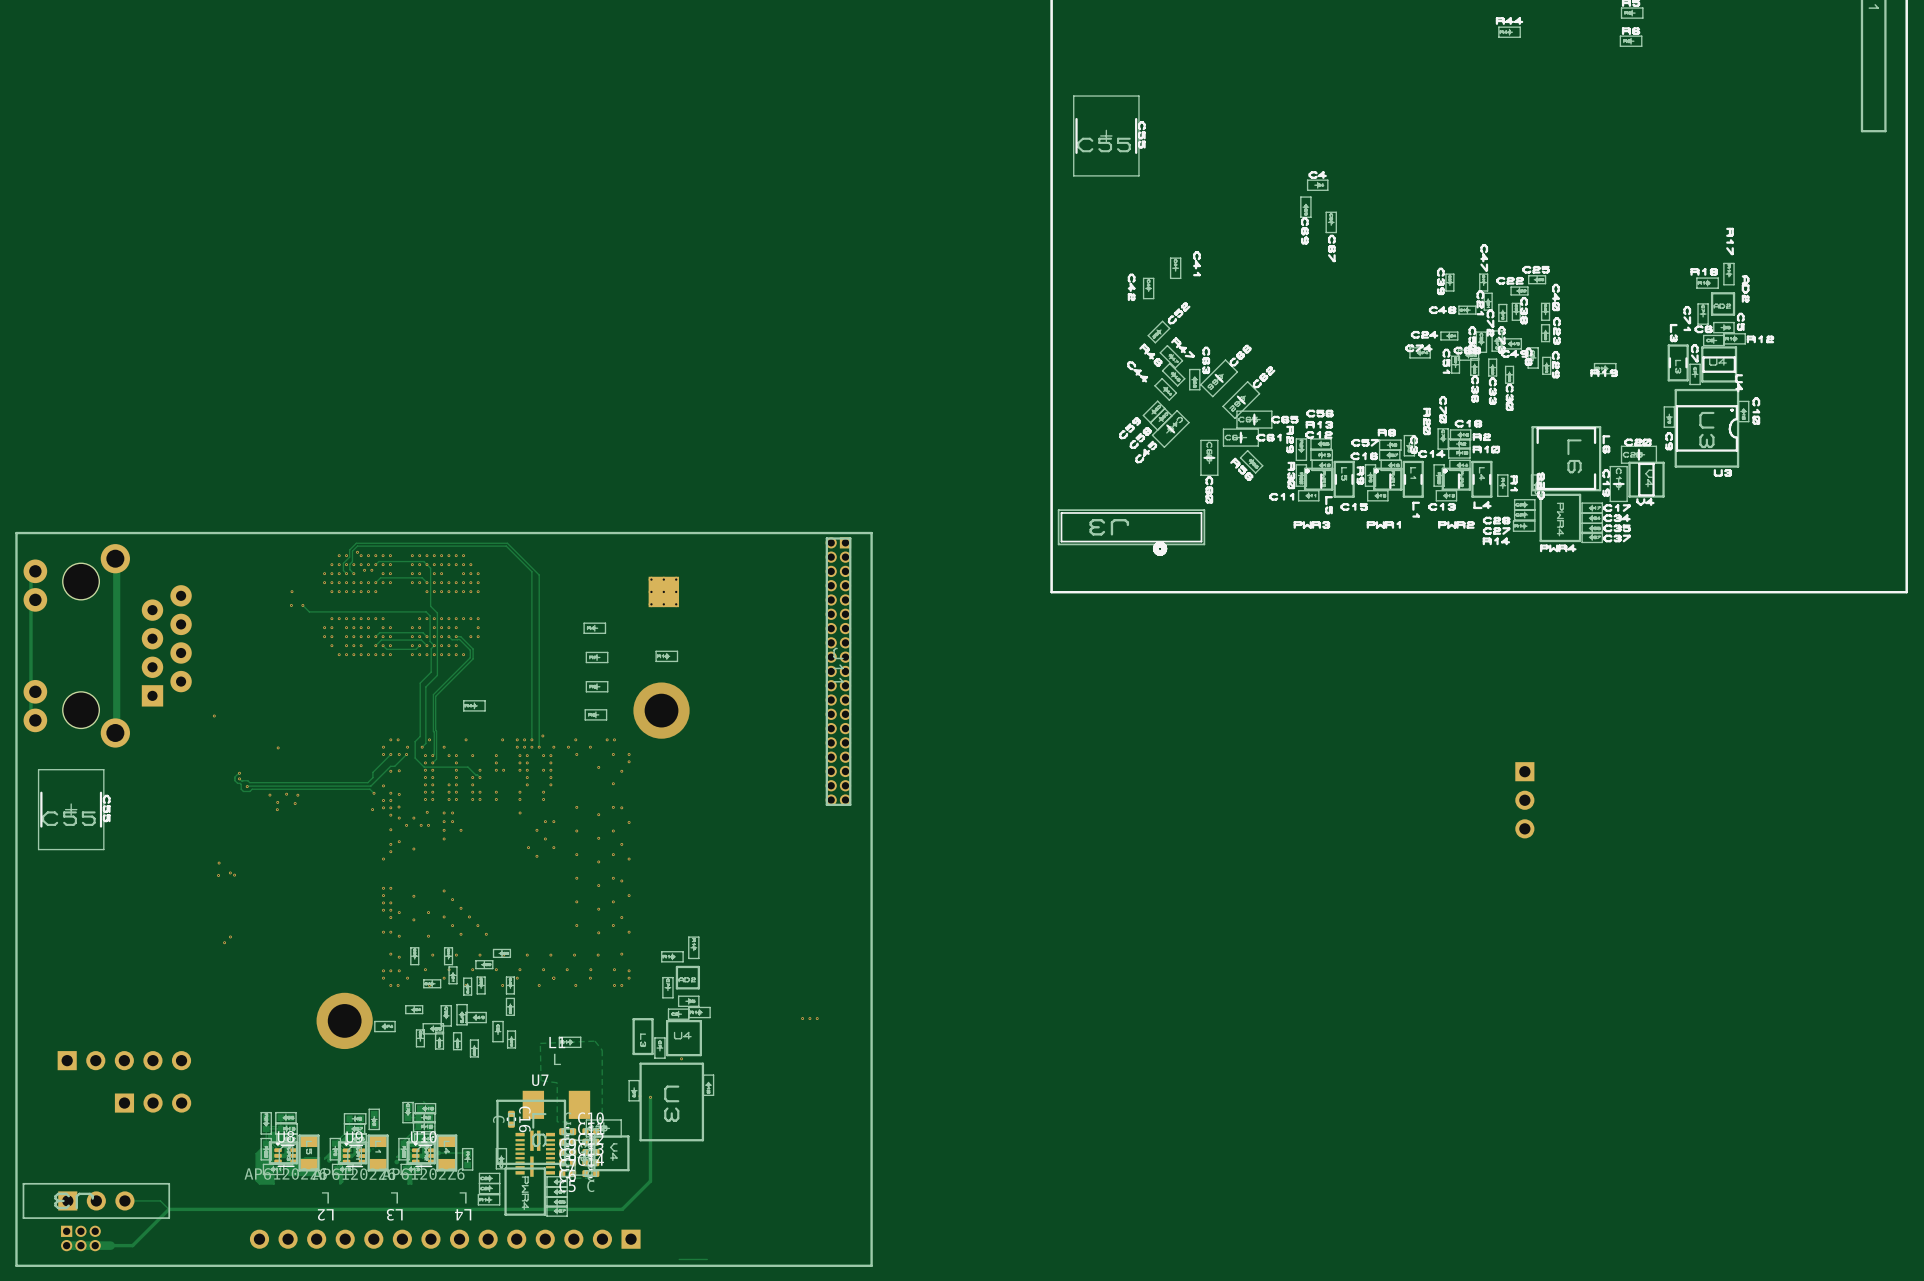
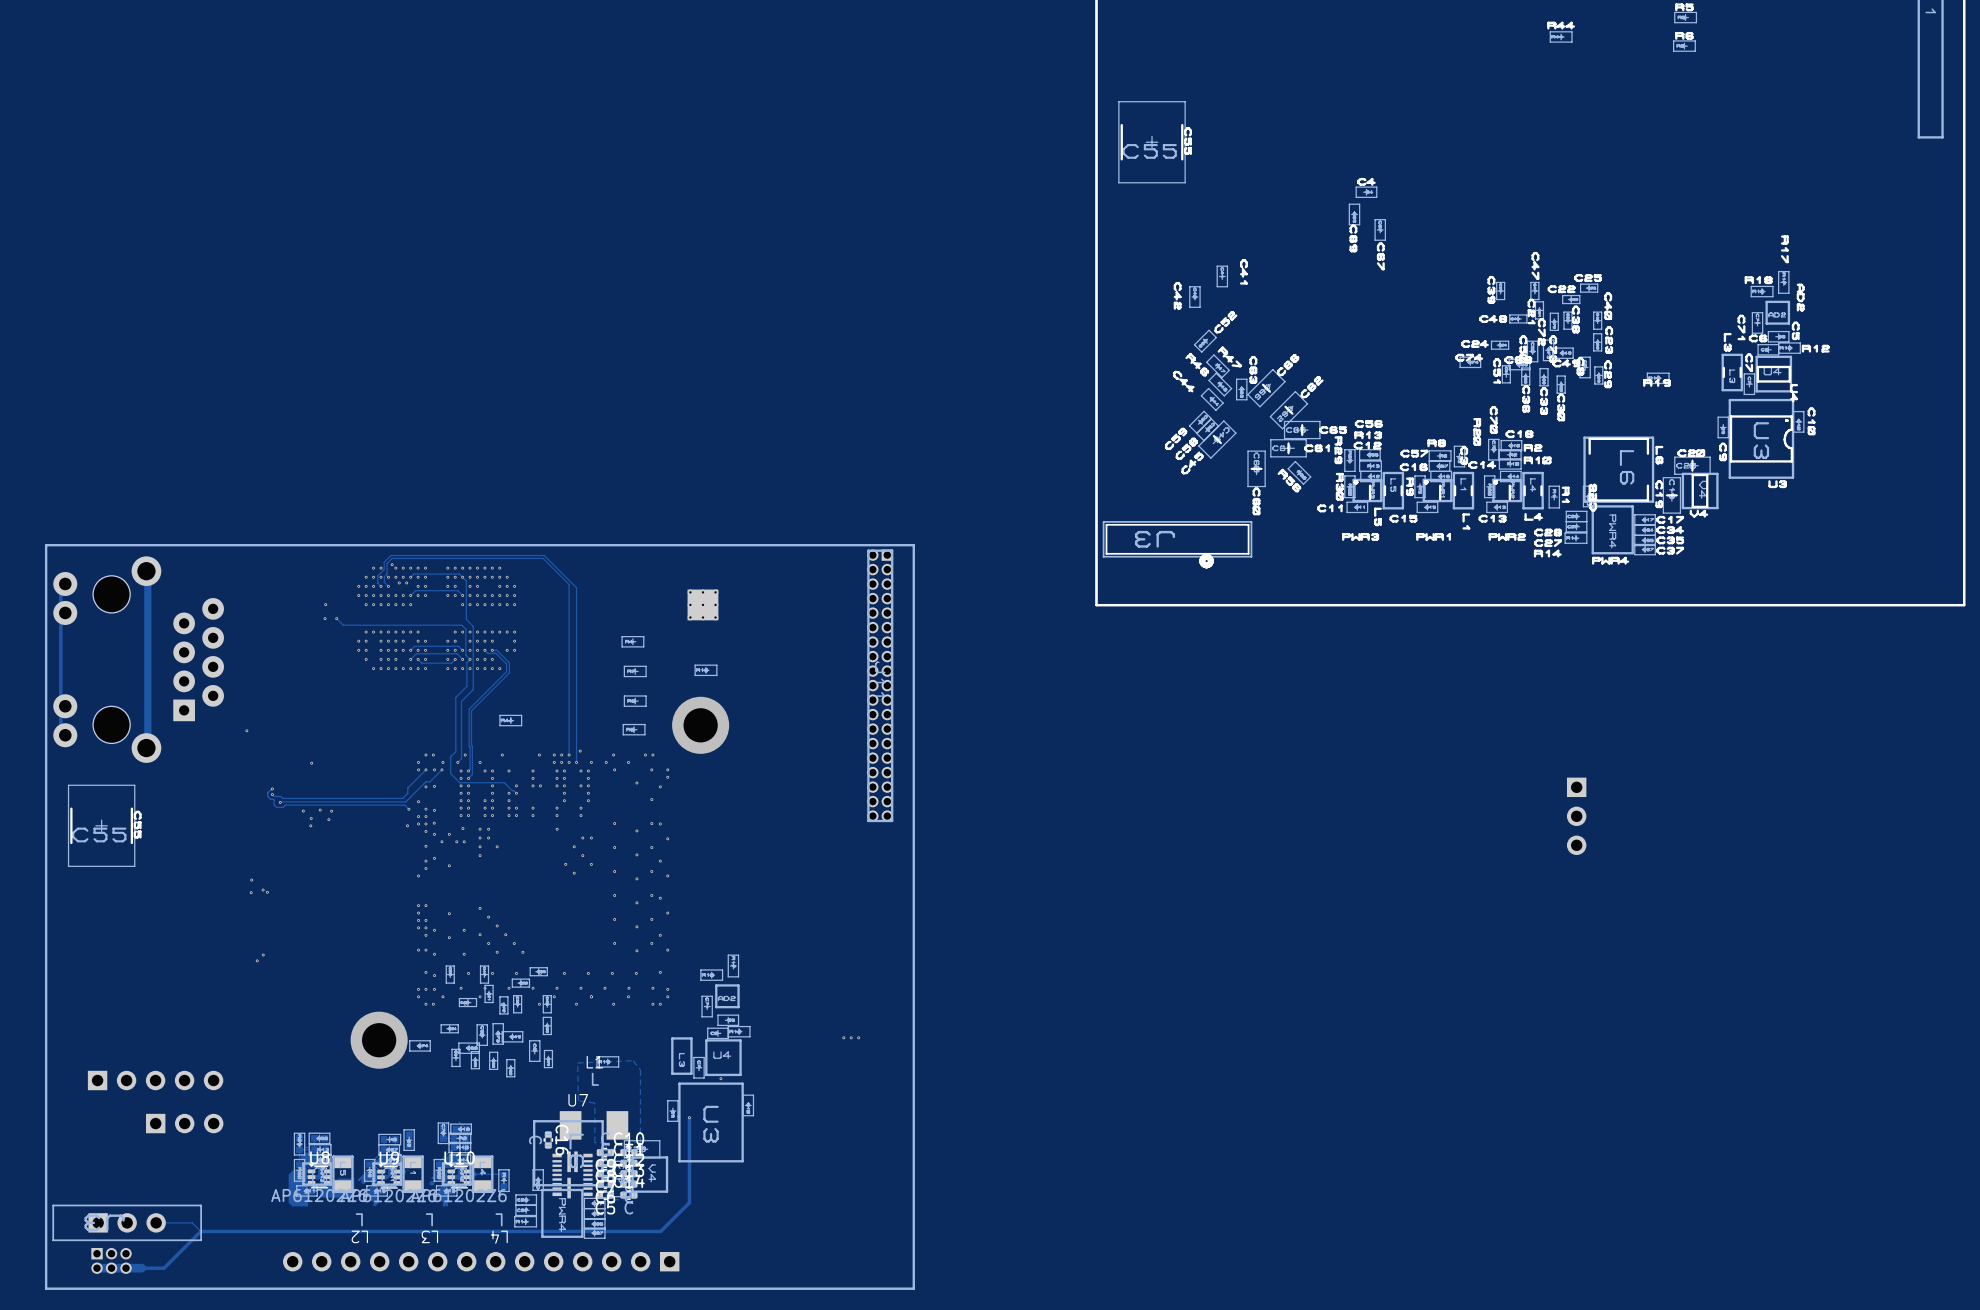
track: (707, 1259) (679, 1259) -> none

